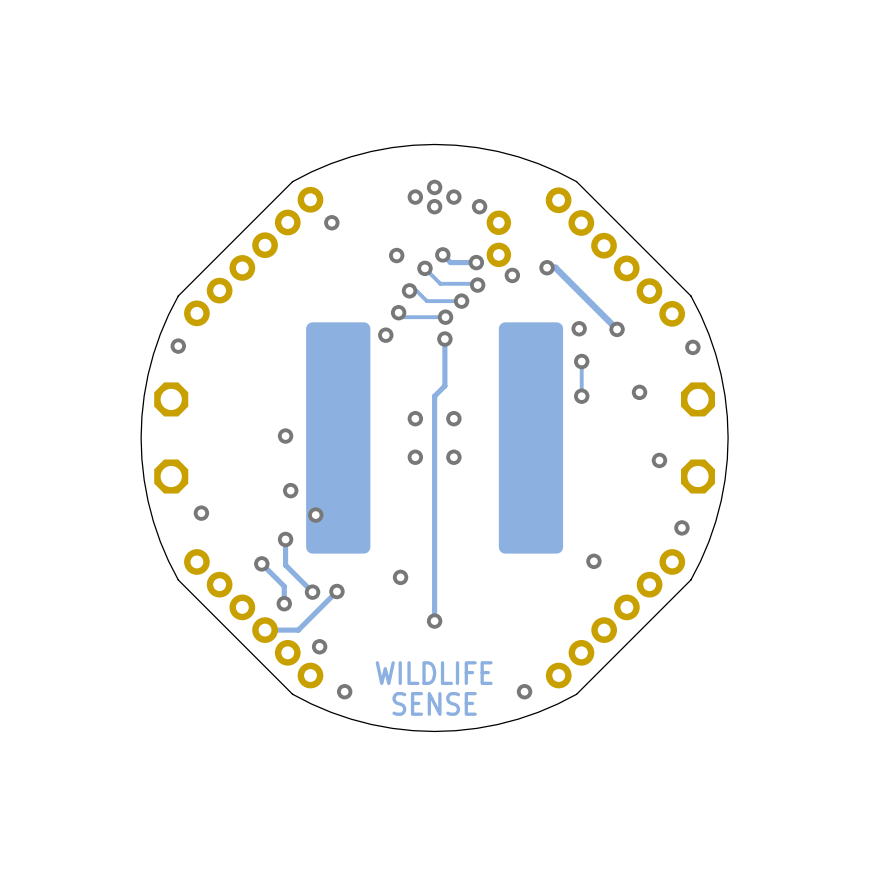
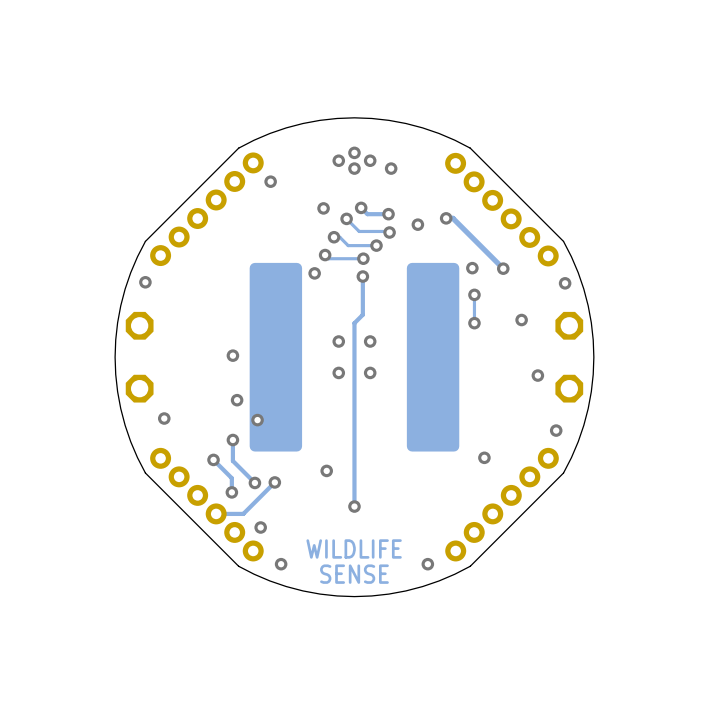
part: (498, 238) -> none

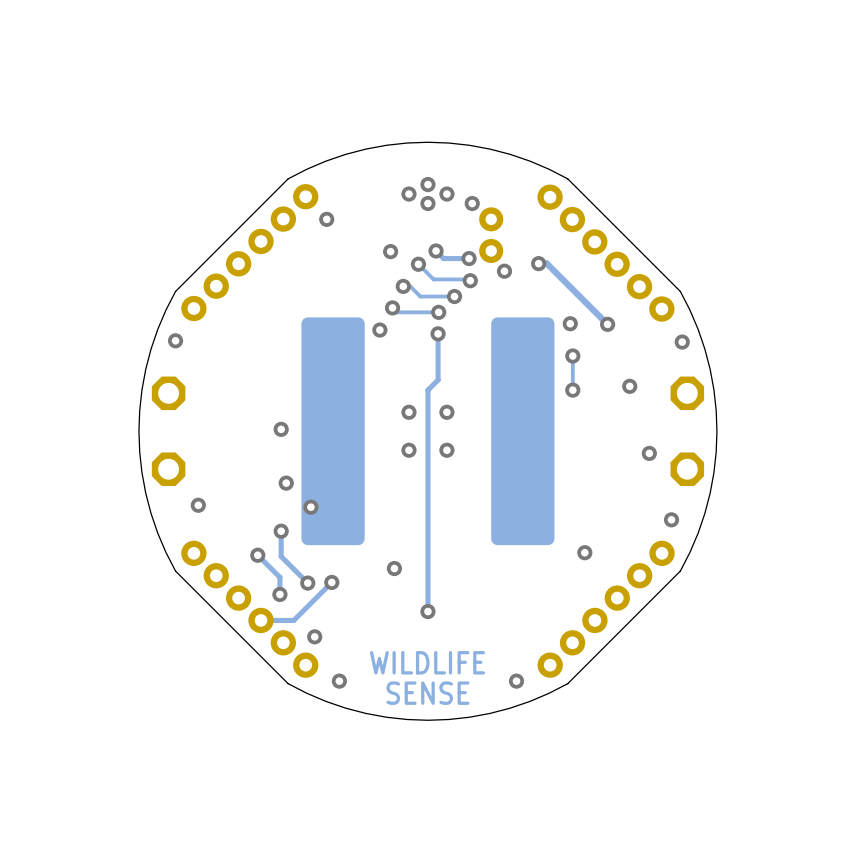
part: none -> (491, 235)

